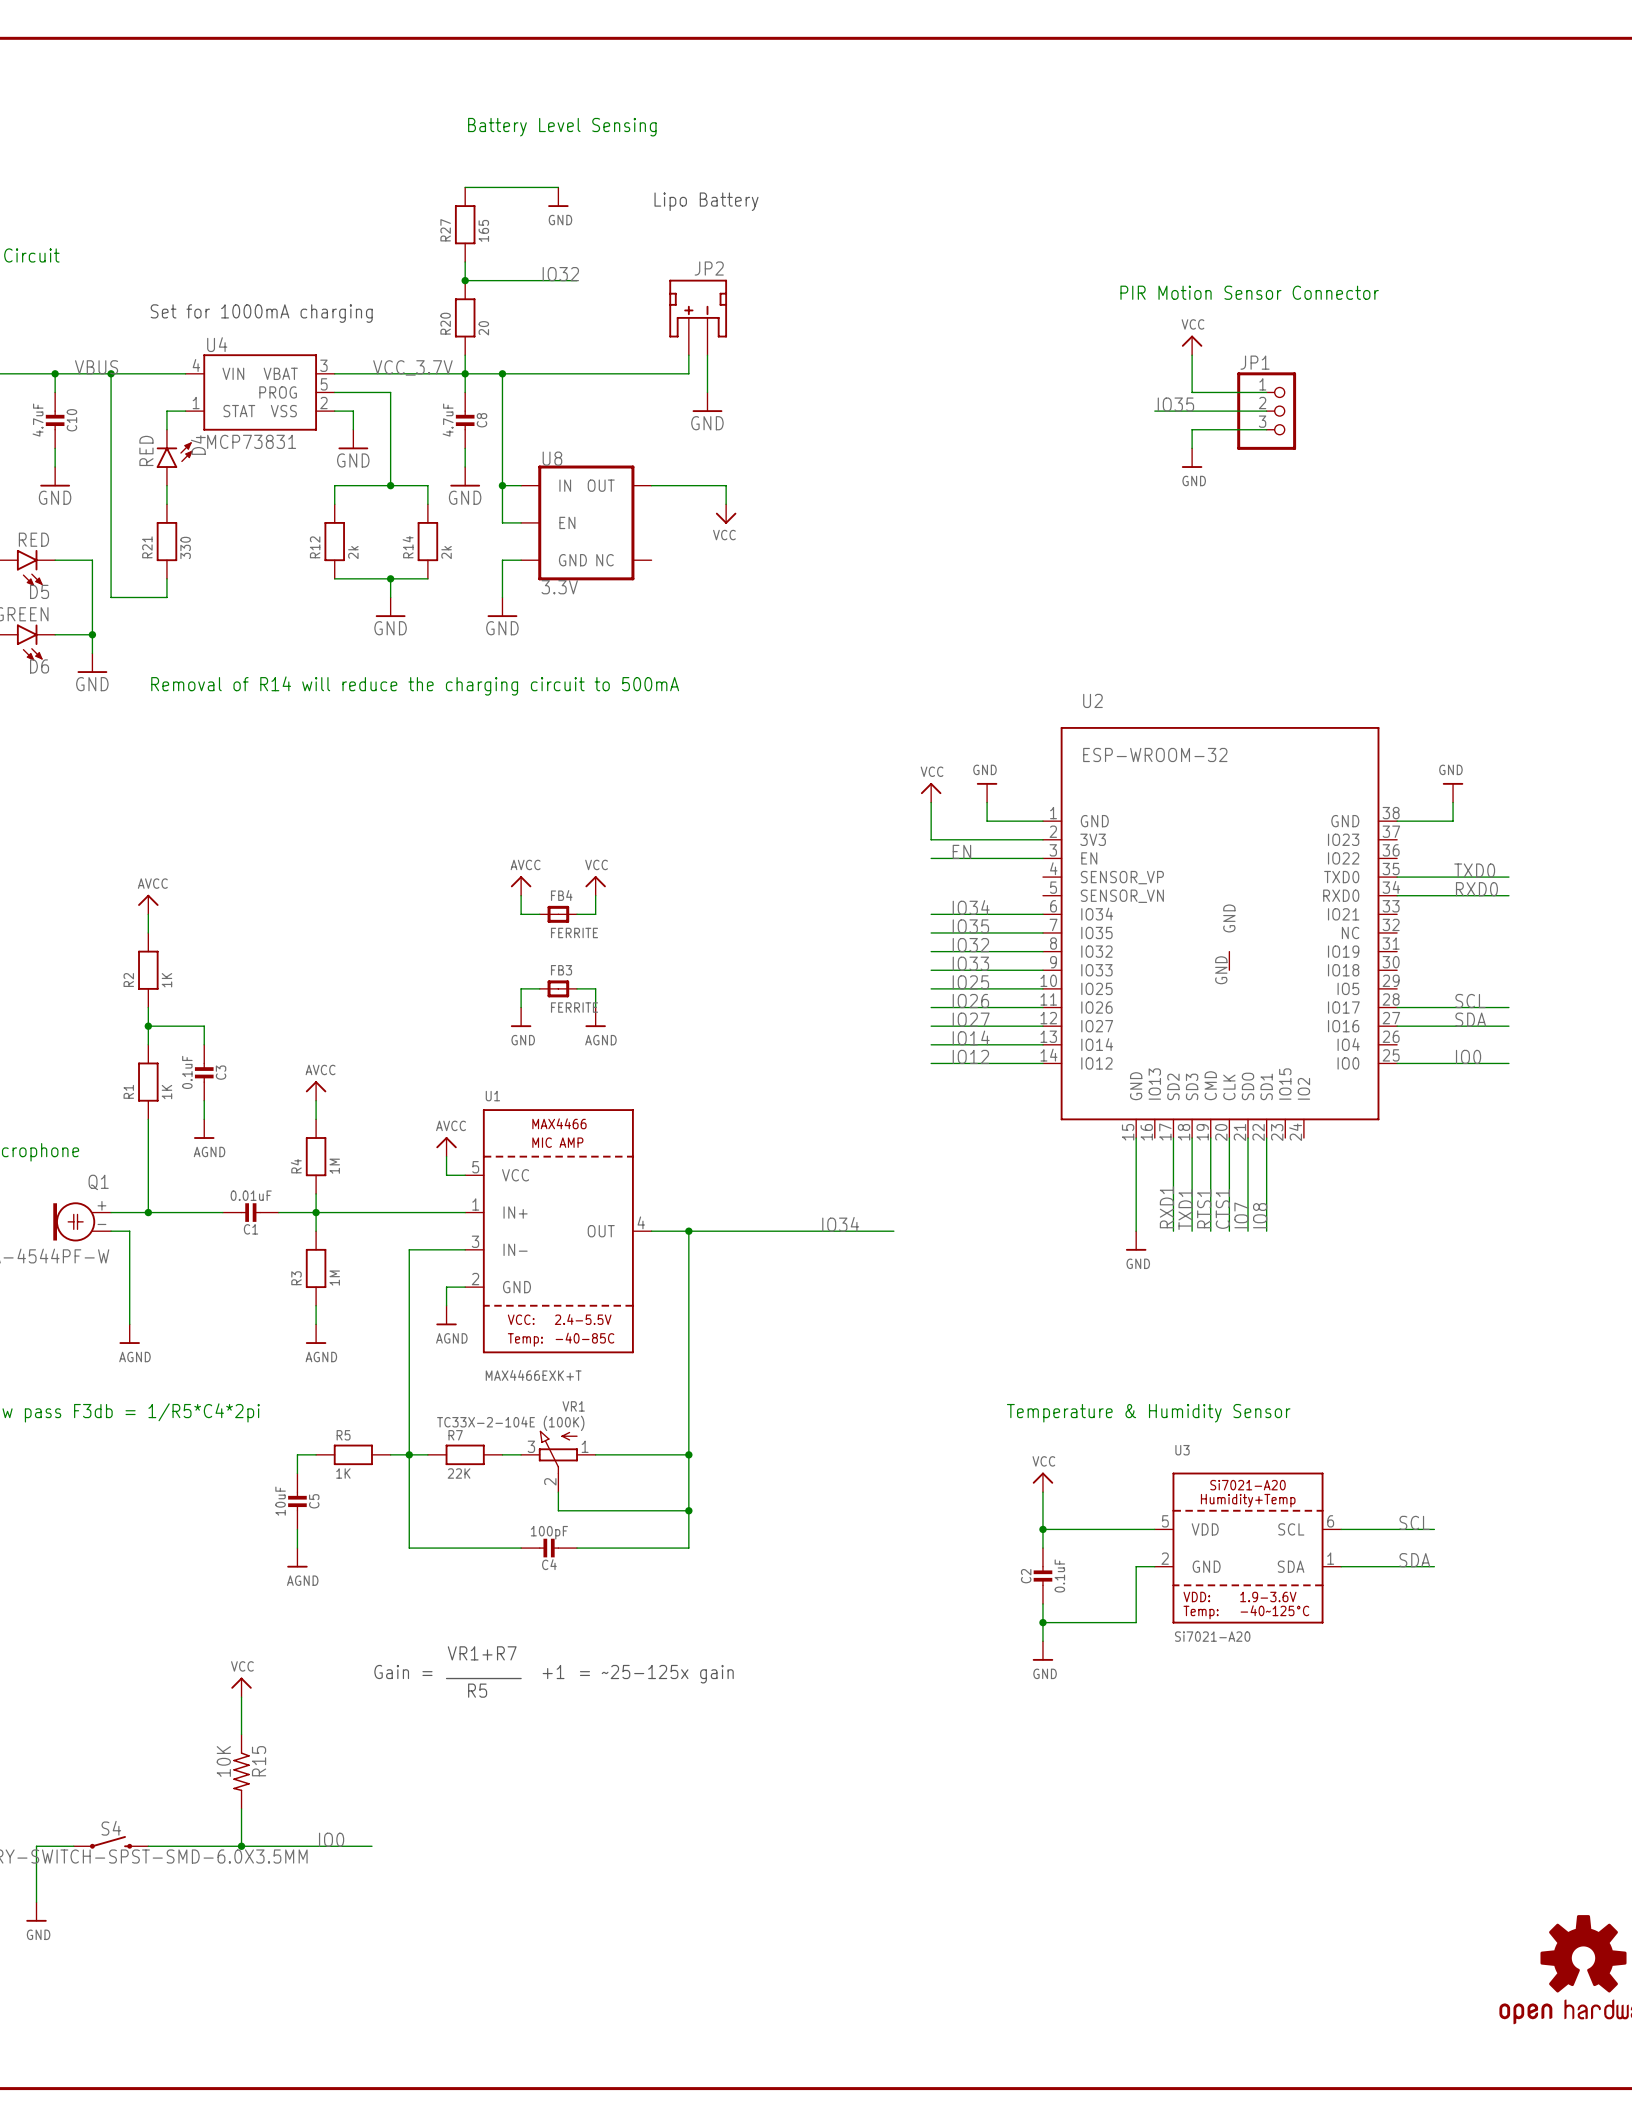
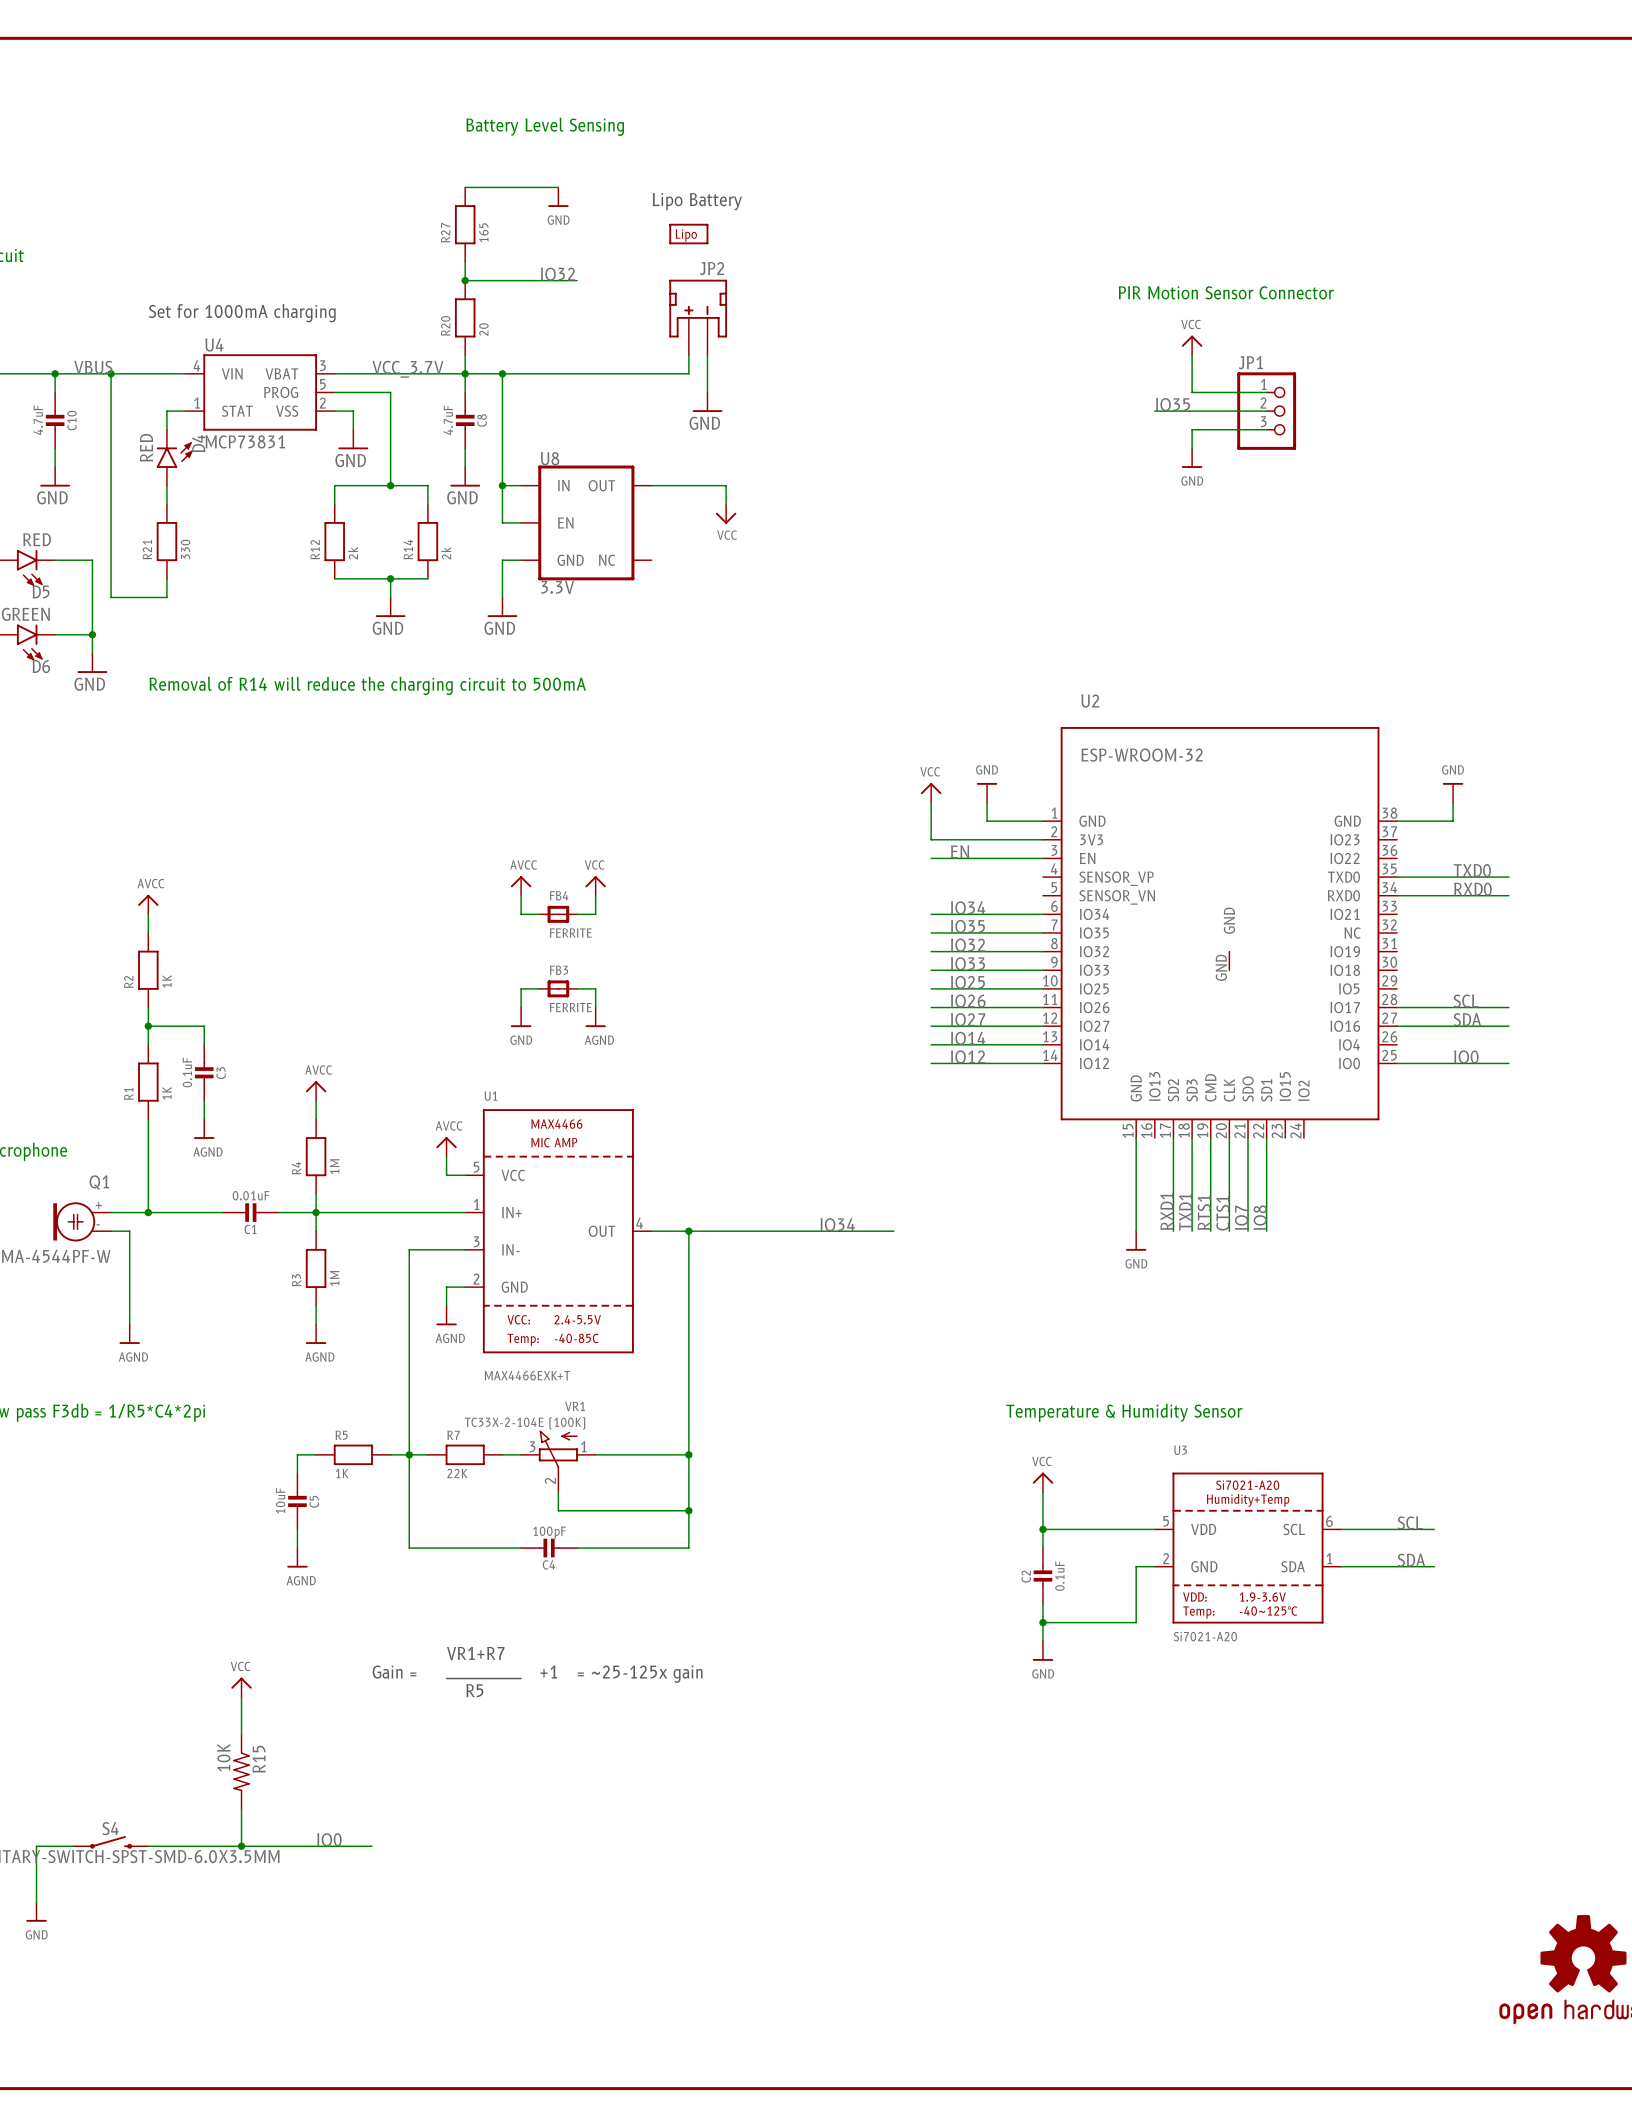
part: none -> (688, 234)

